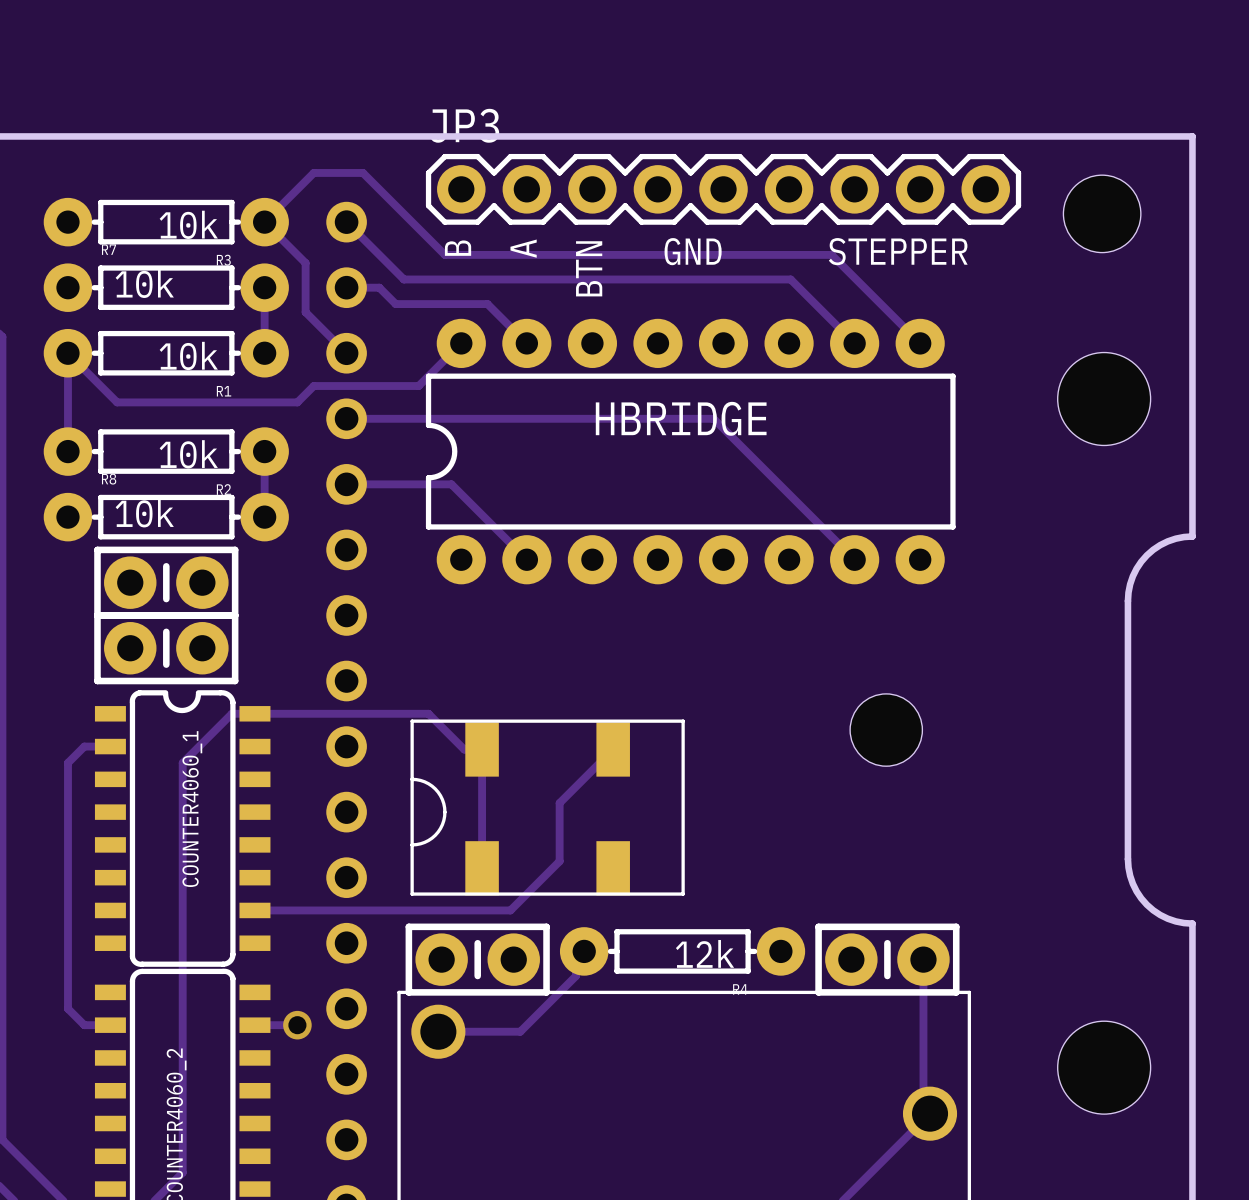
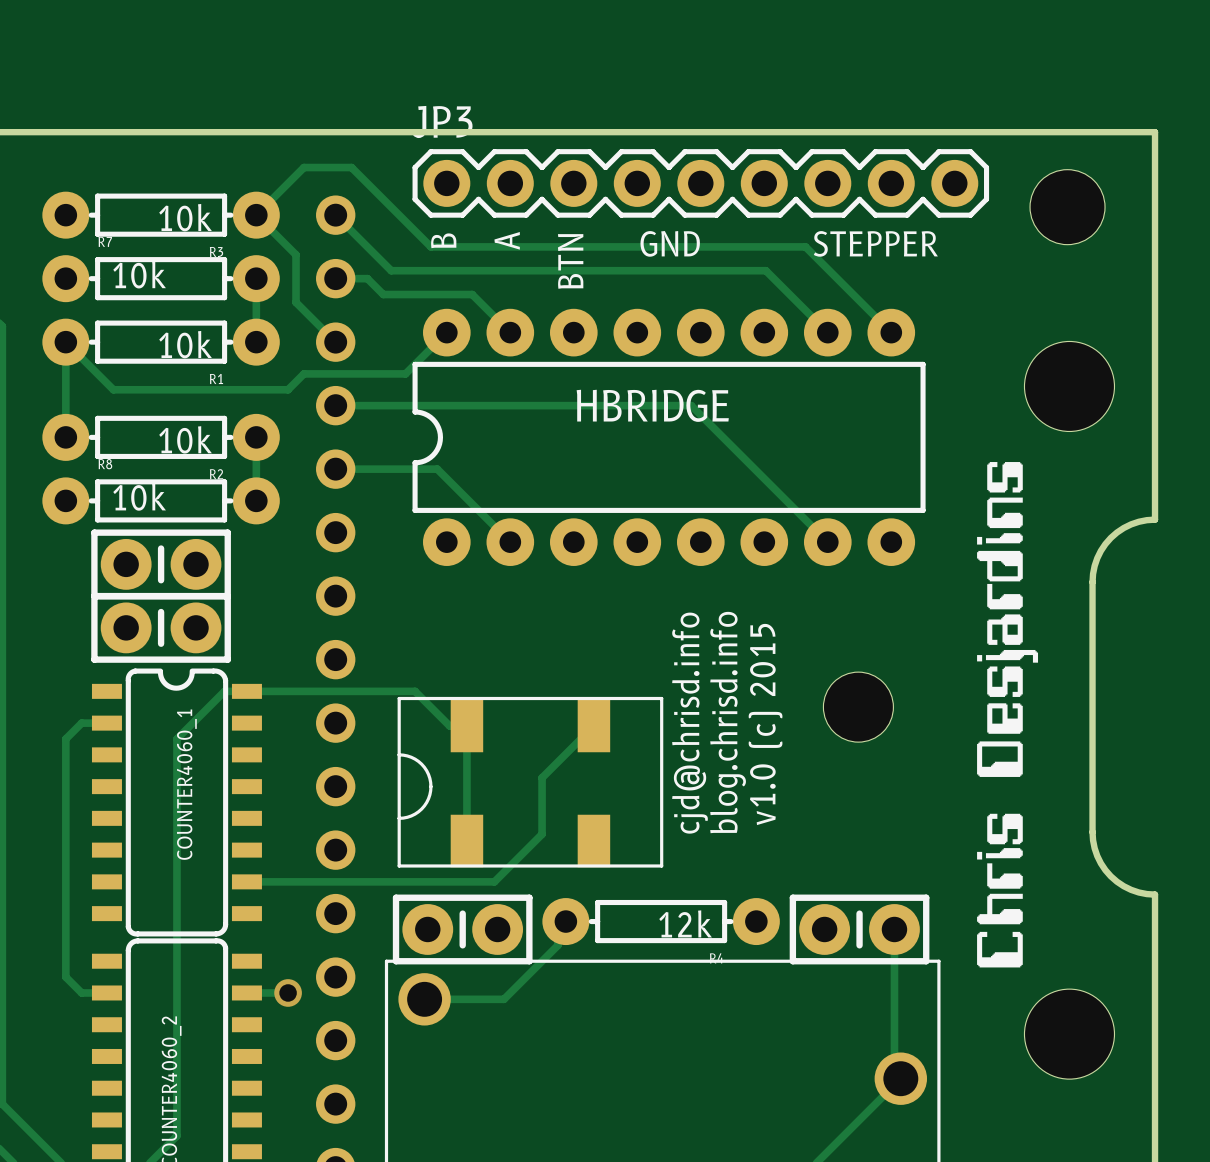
drawing: none -> [977, 462, 1039, 968]
text: none -> cjd@chrisd.info (690, 723)
text: none -> blog.chrisd.info (728, 722)
text: none -> v1.0 (c) 2015 (765, 724)

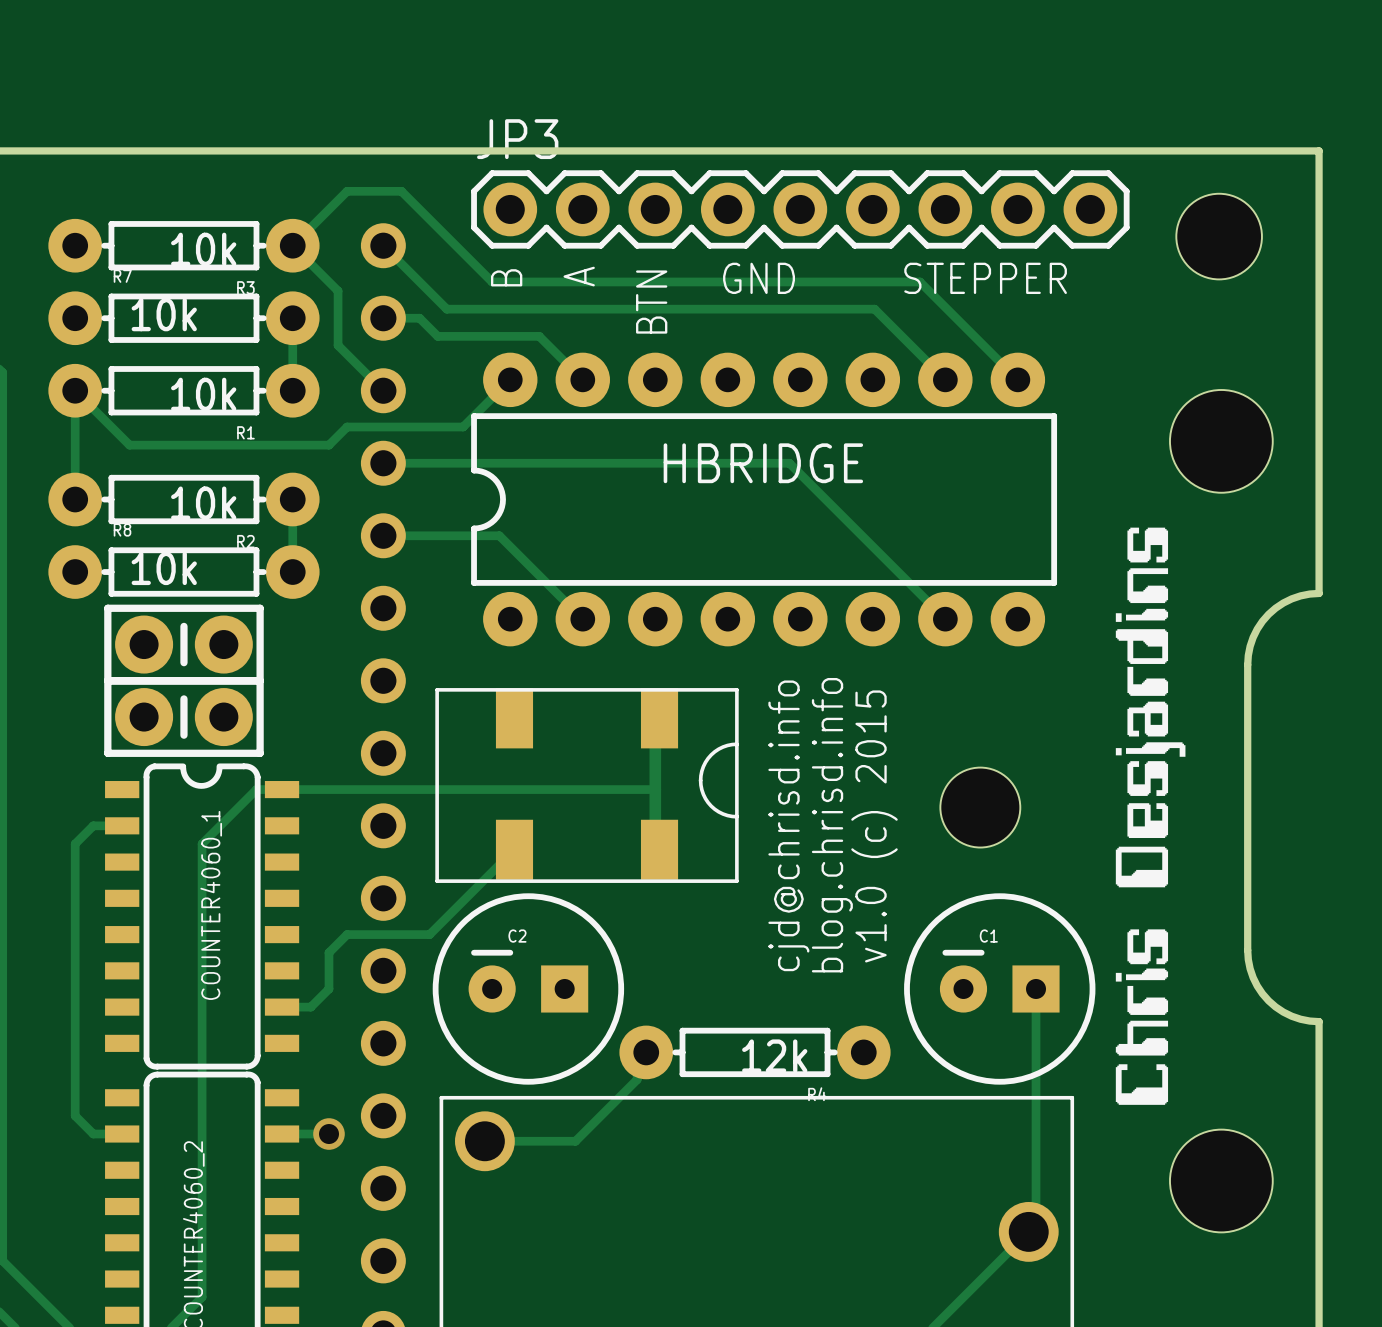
track: none -> (659, 718) (655, 722) (655, 845) (659, 849)
track: (415, 691) (449, 726) (466, 726) (466, 840) -> (474, 789) (655, 789)
track: (593, 726) (542, 777) (542, 834) (494, 881) (272, 881) -> (514, 849) (429, 934) (347, 934) (328, 952) (328, 988) (310, 1007)
part rotation: 0° (530, 782) -> 180° (587, 785)
C2: none -> (528, 988)
C1: none -> (999, 988)
part: (462, 929) -> none
part: (859, 929) -> none
track: (894, 929) (894, 1072) (900, 1078) -> (1036, 988) (1036, 1224) (1028, 1231)

